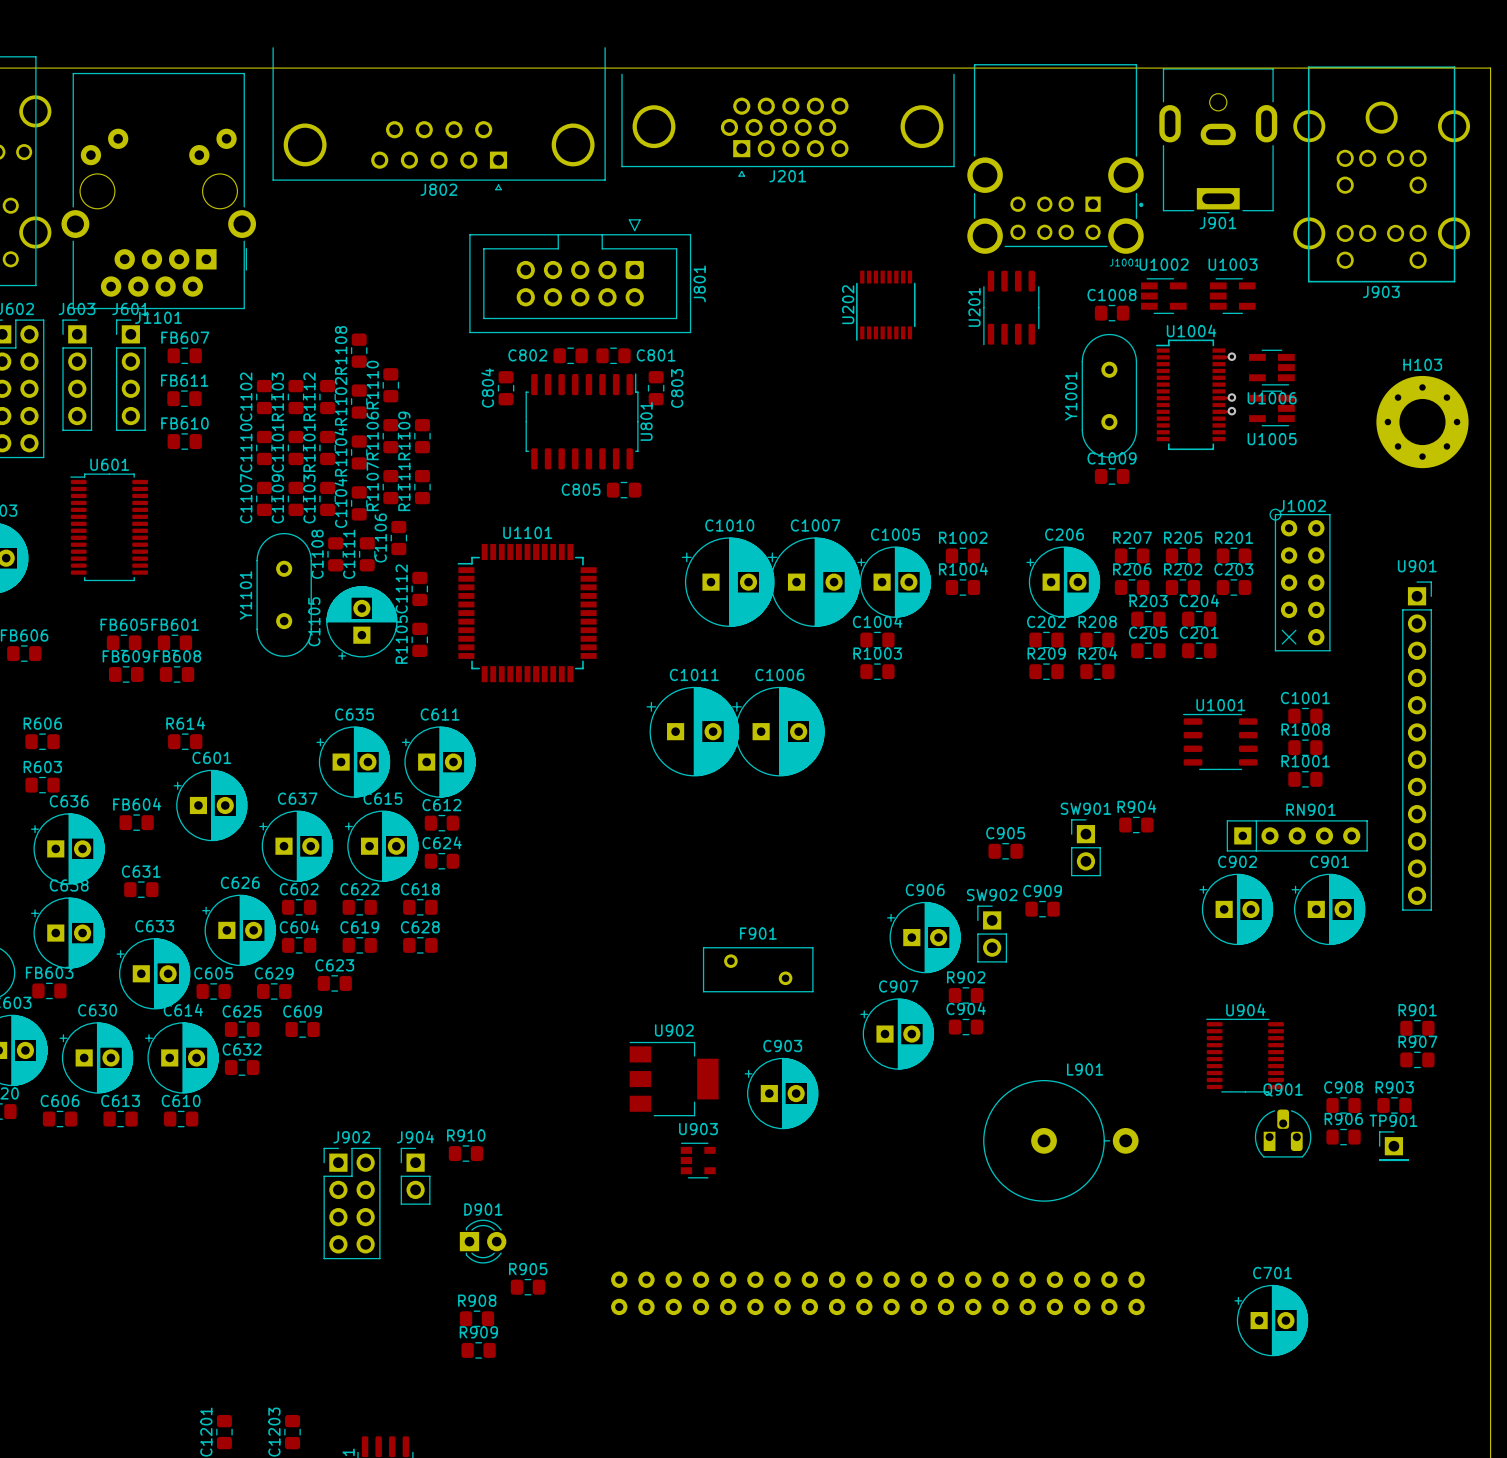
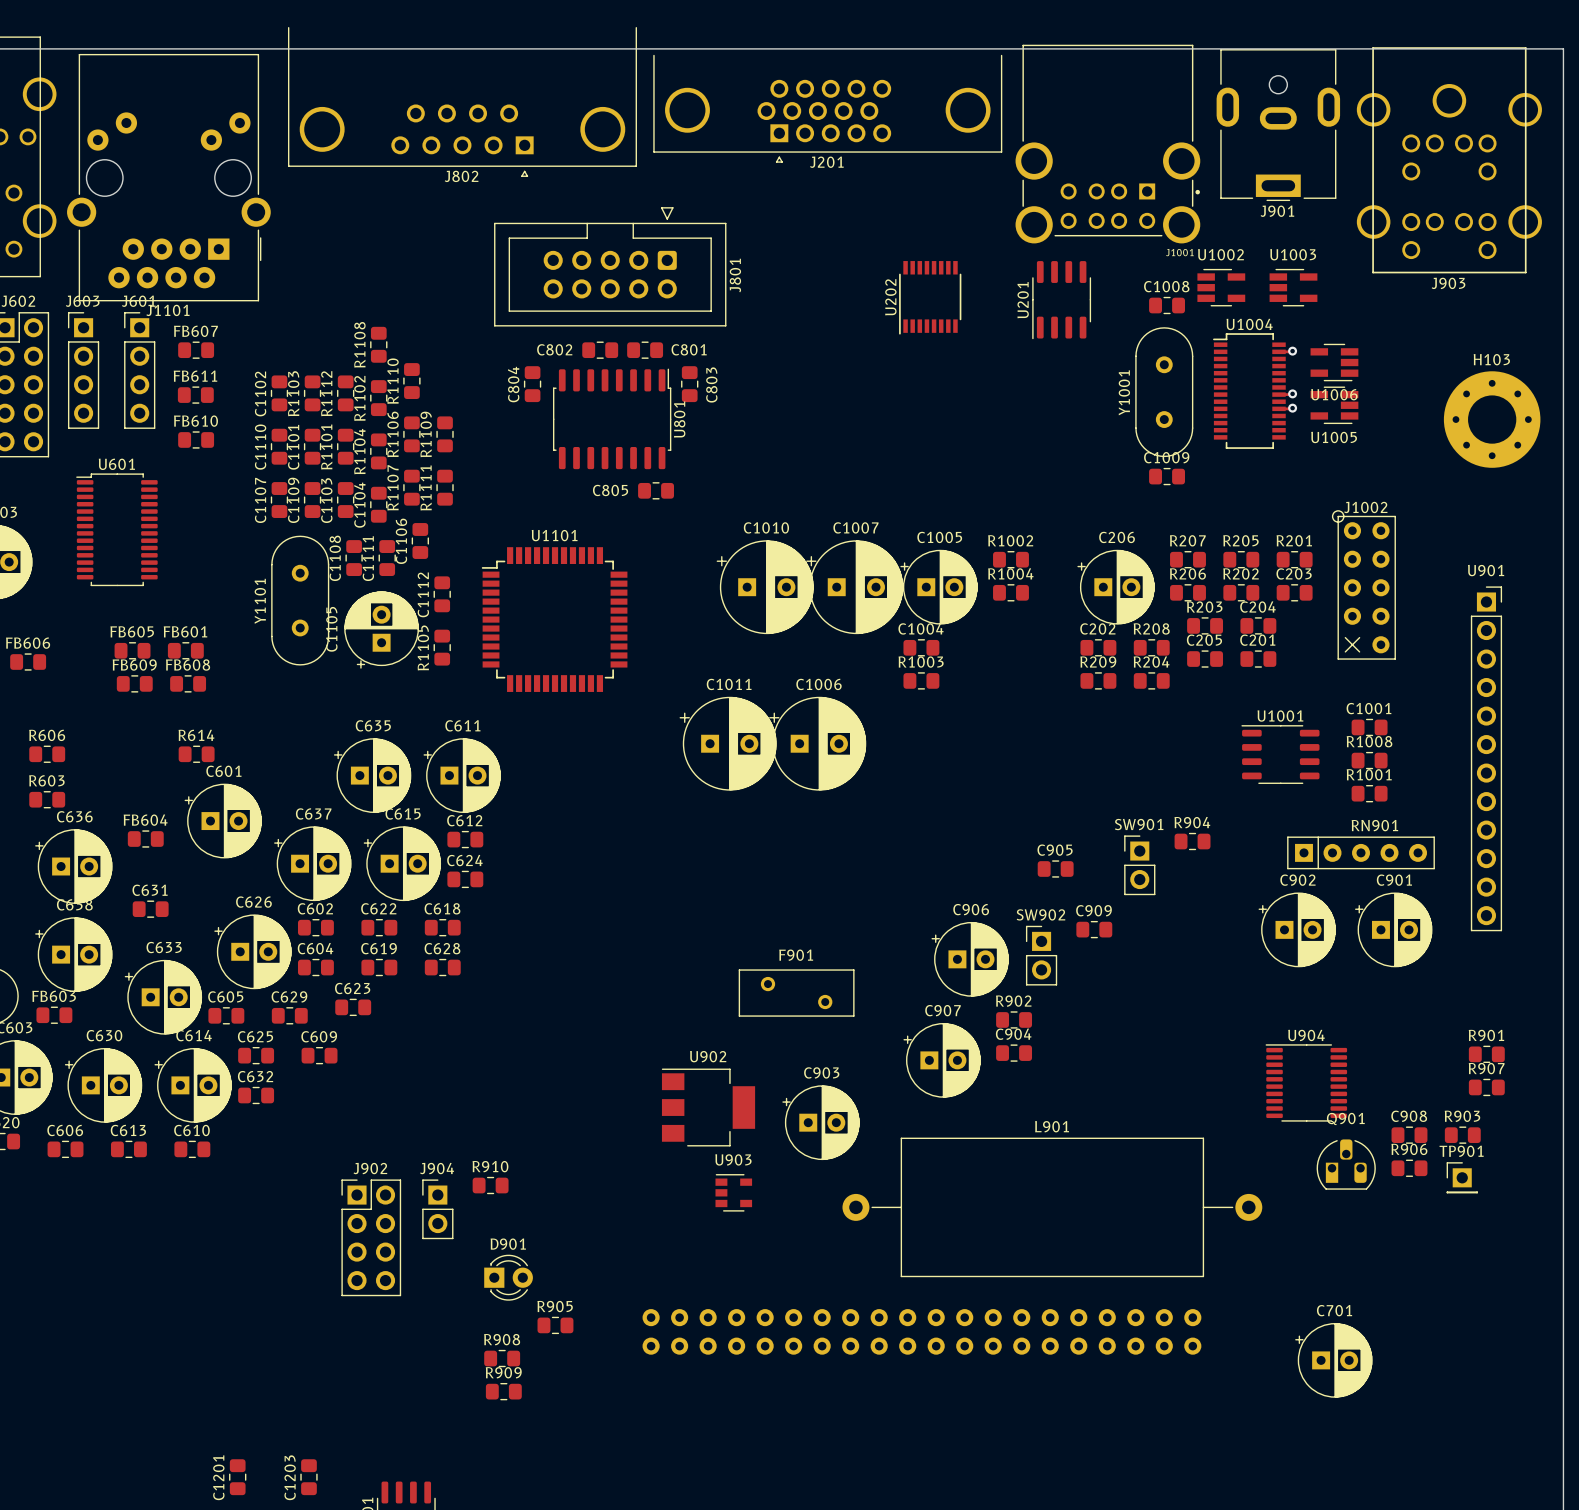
L901 name position: L901 (1085, 1069) -> L901 (1052, 1126)
L901 footprint: [983, 1079, 1139, 1202] -> [842, 1137, 1263, 1278]

